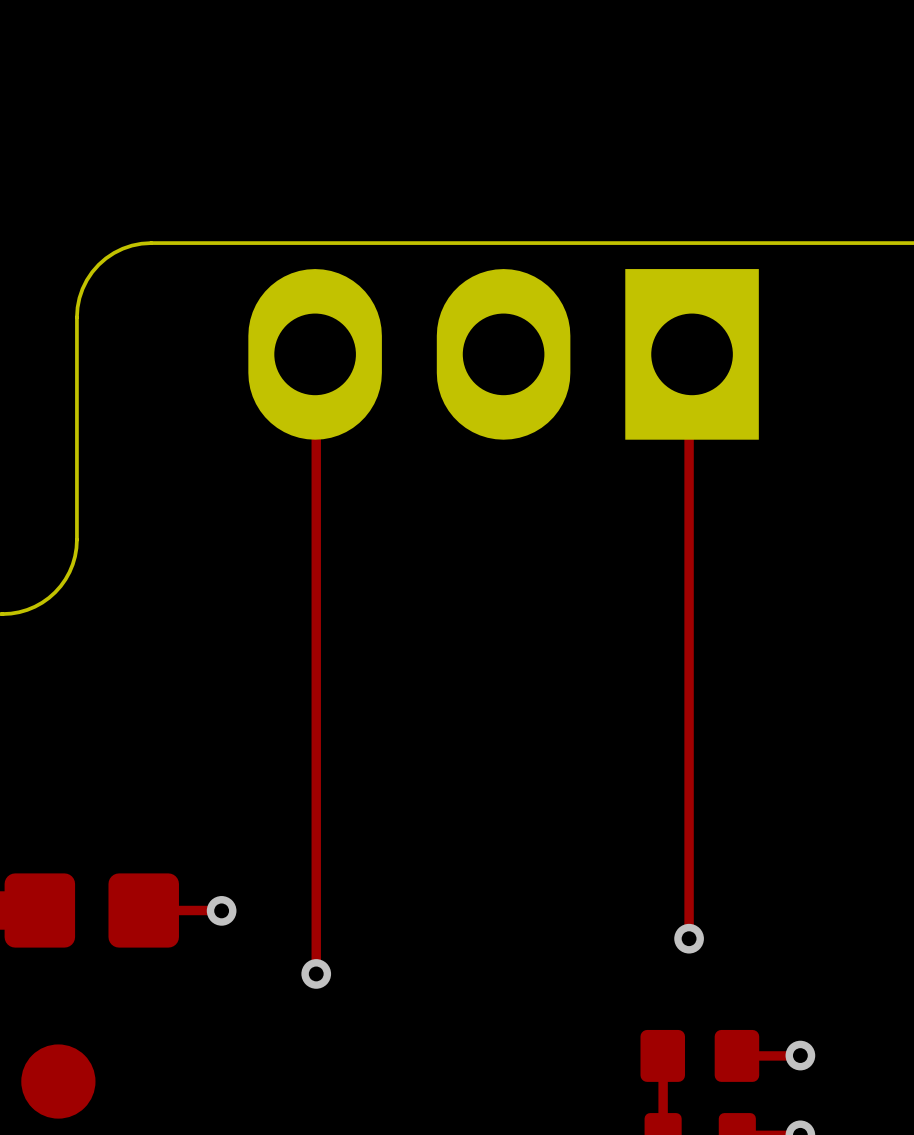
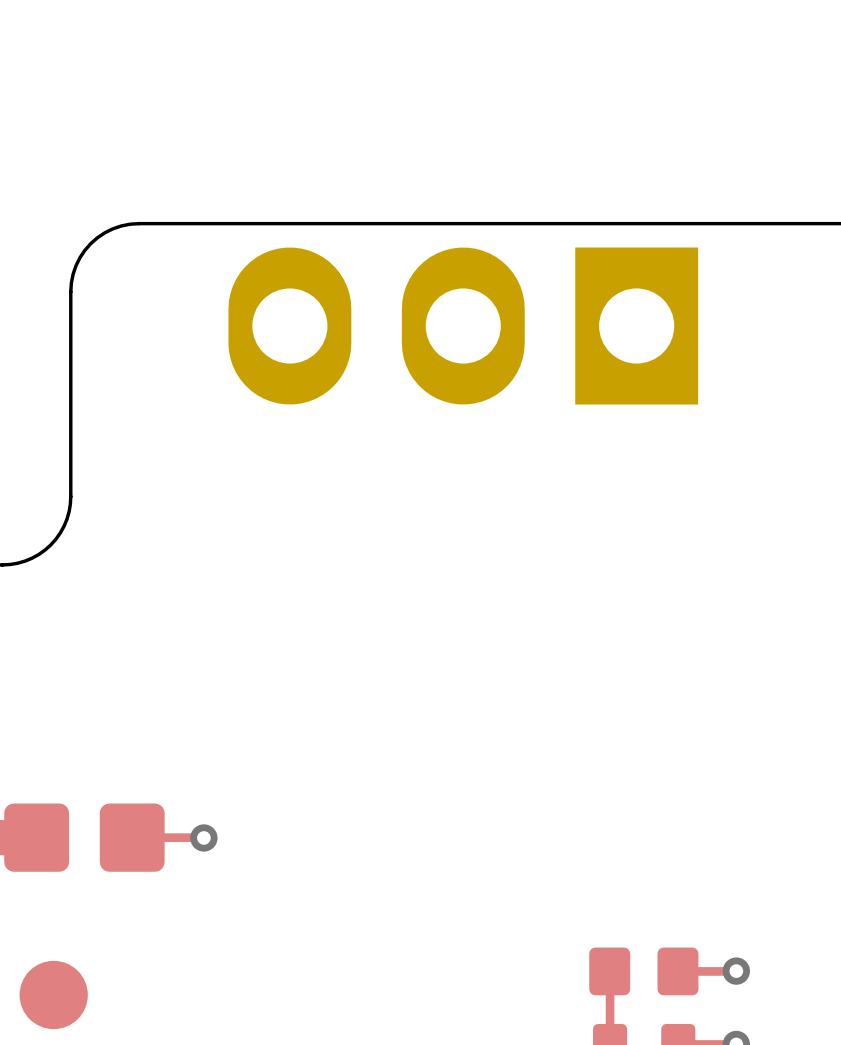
top track: (315, 354) (316, 973) -> none
top track: (692, 354) (689, 357) (689, 938) -> none
via: (689, 938) -> none
via: (316, 973) -> none

